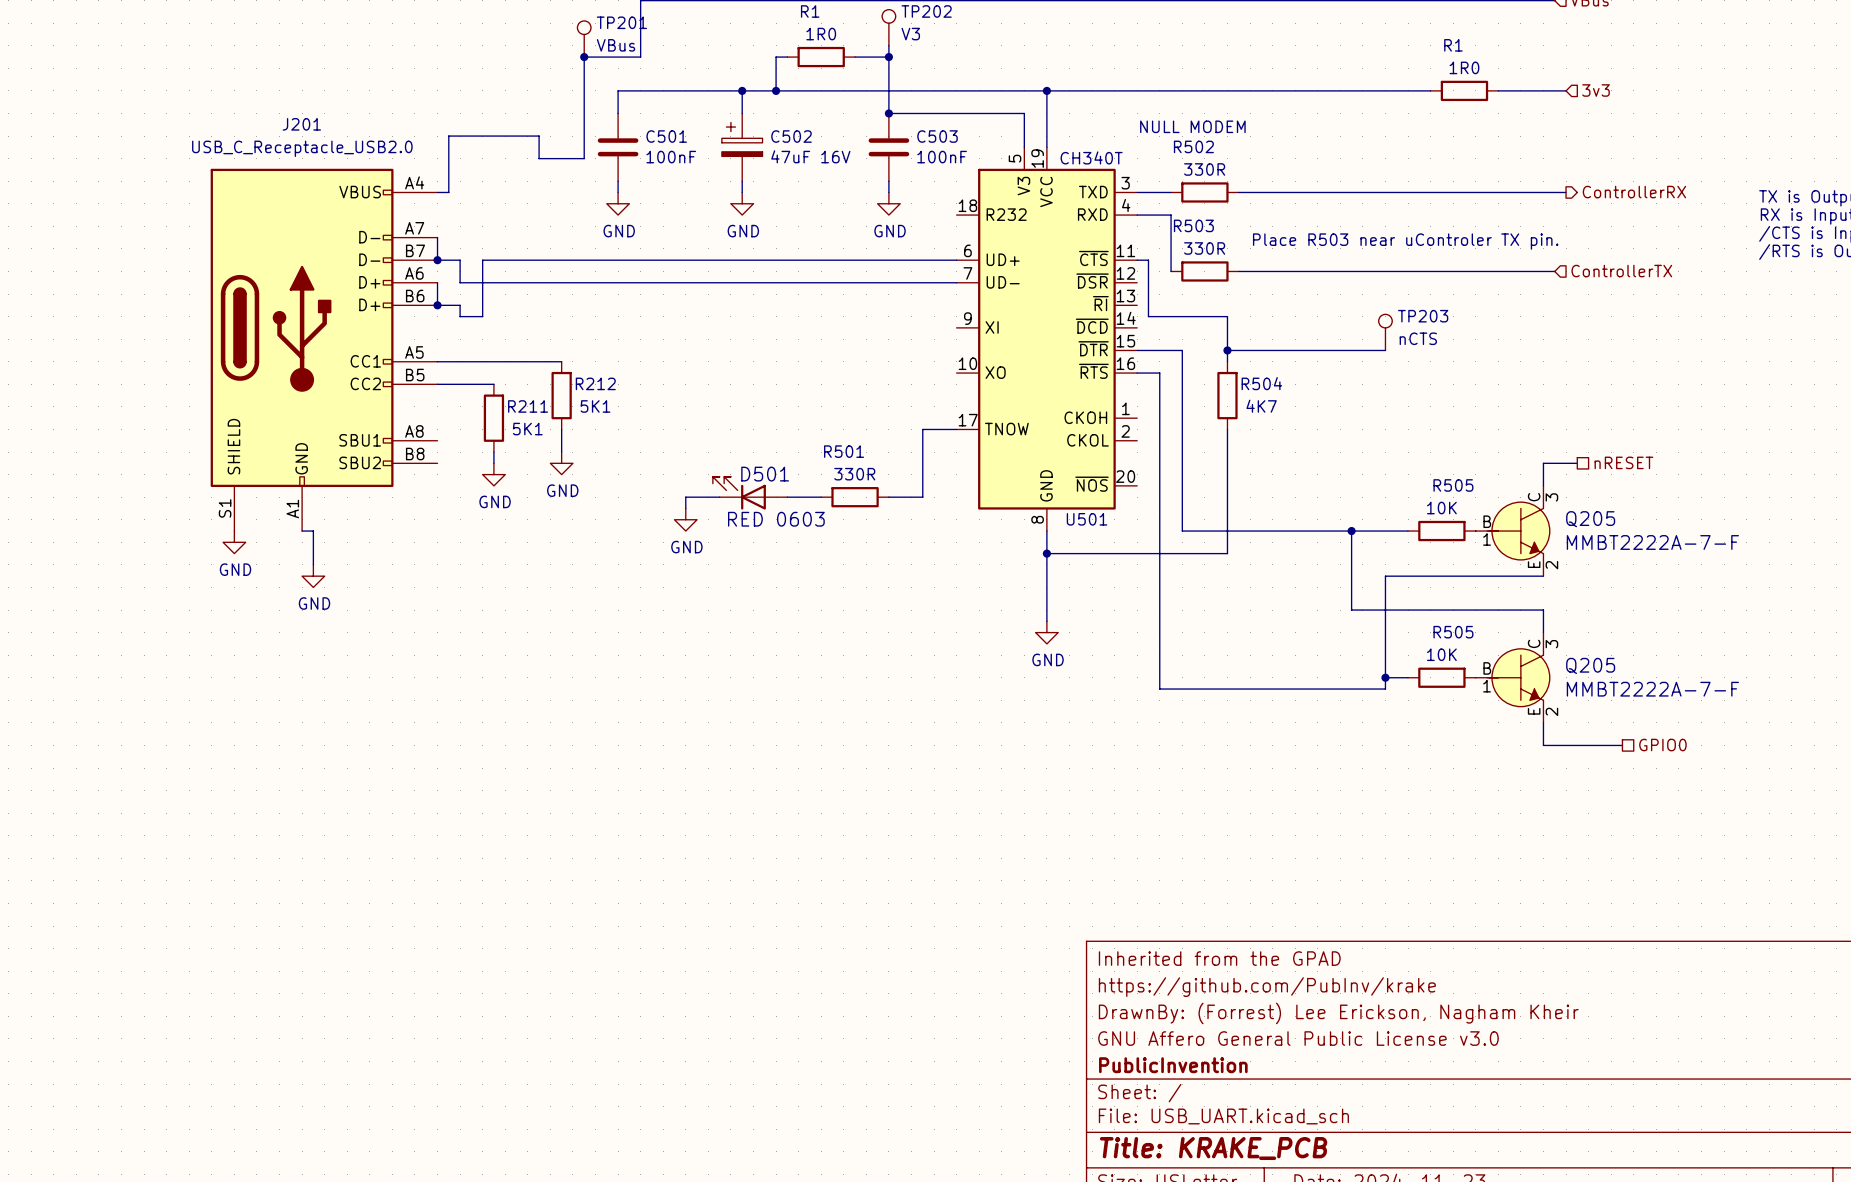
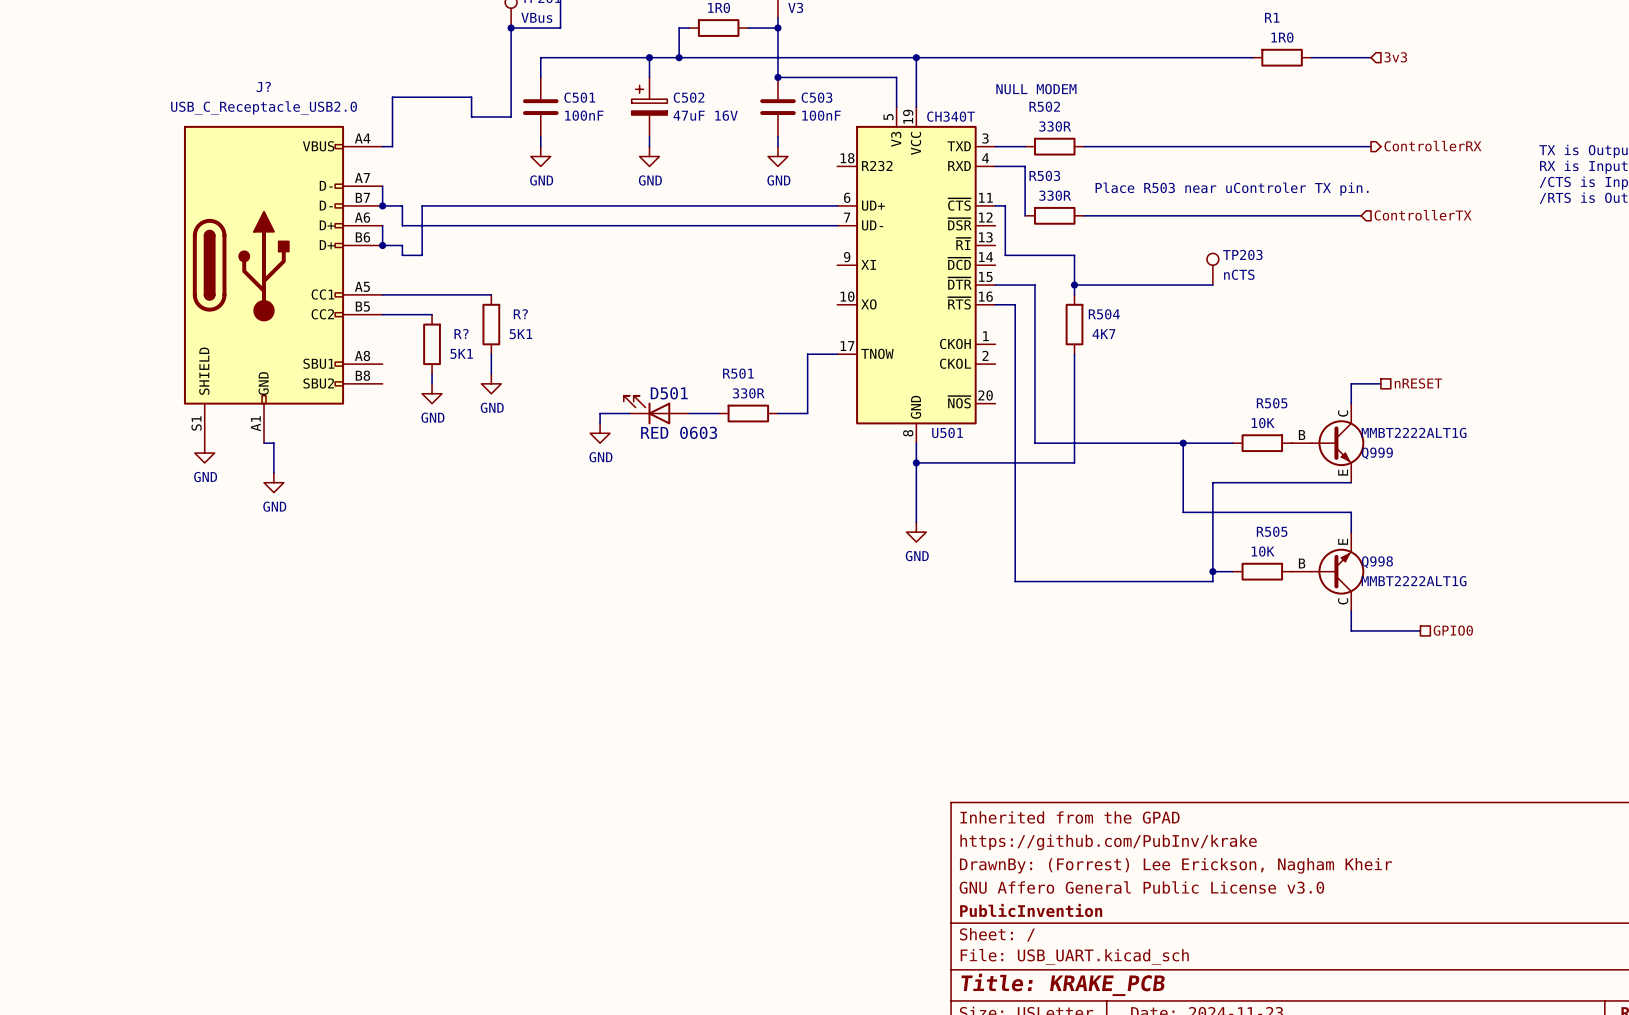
J201 name: J201 (301, 124) -> J? (263, 86)
R212 name: R212 (595, 383) -> R? (520, 314)
R211 name: R211 (528, 406) -> R? (461, 333)
Q205: MMBT2222A-7-F (1512, 531) -> none
Q999: none -> MMBT2222ALT1G (1328, 443)
Q205: MMBT2222A-7-F (1512, 677) -> none
Q998: none -> MMBT2222ALT1G (1328, 571)

